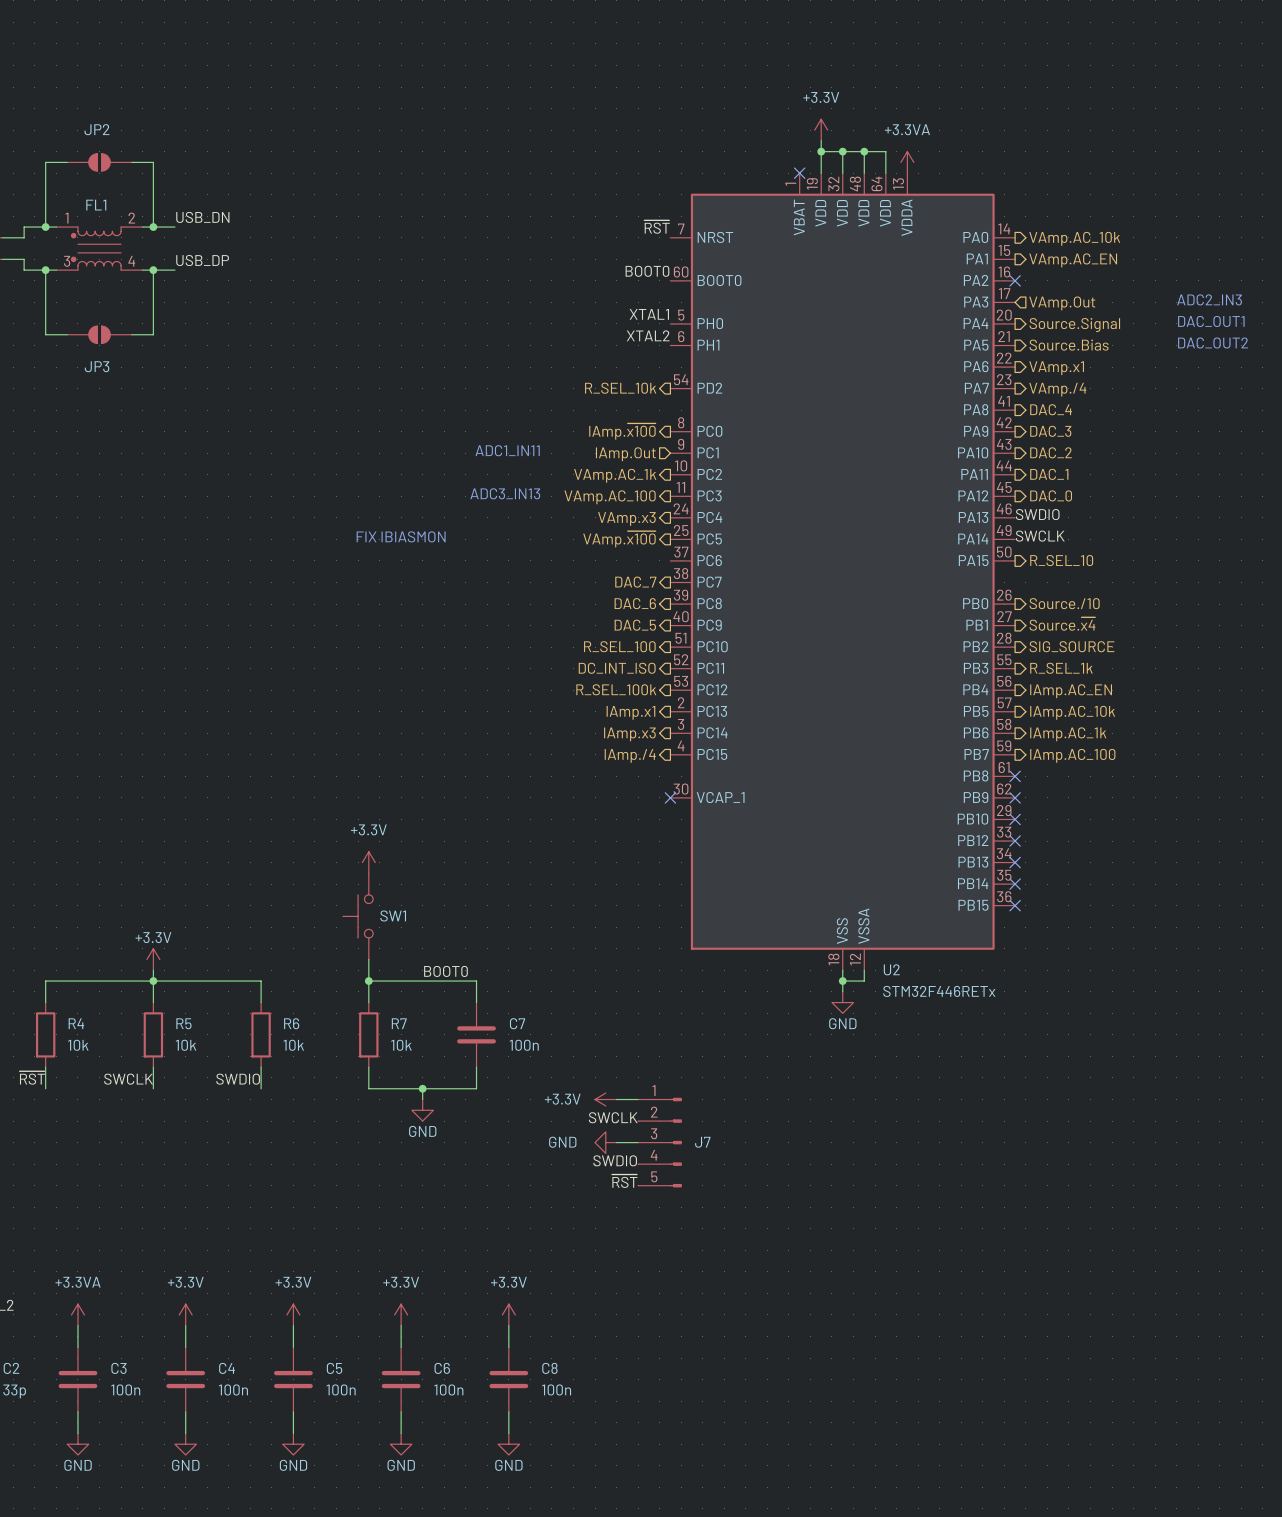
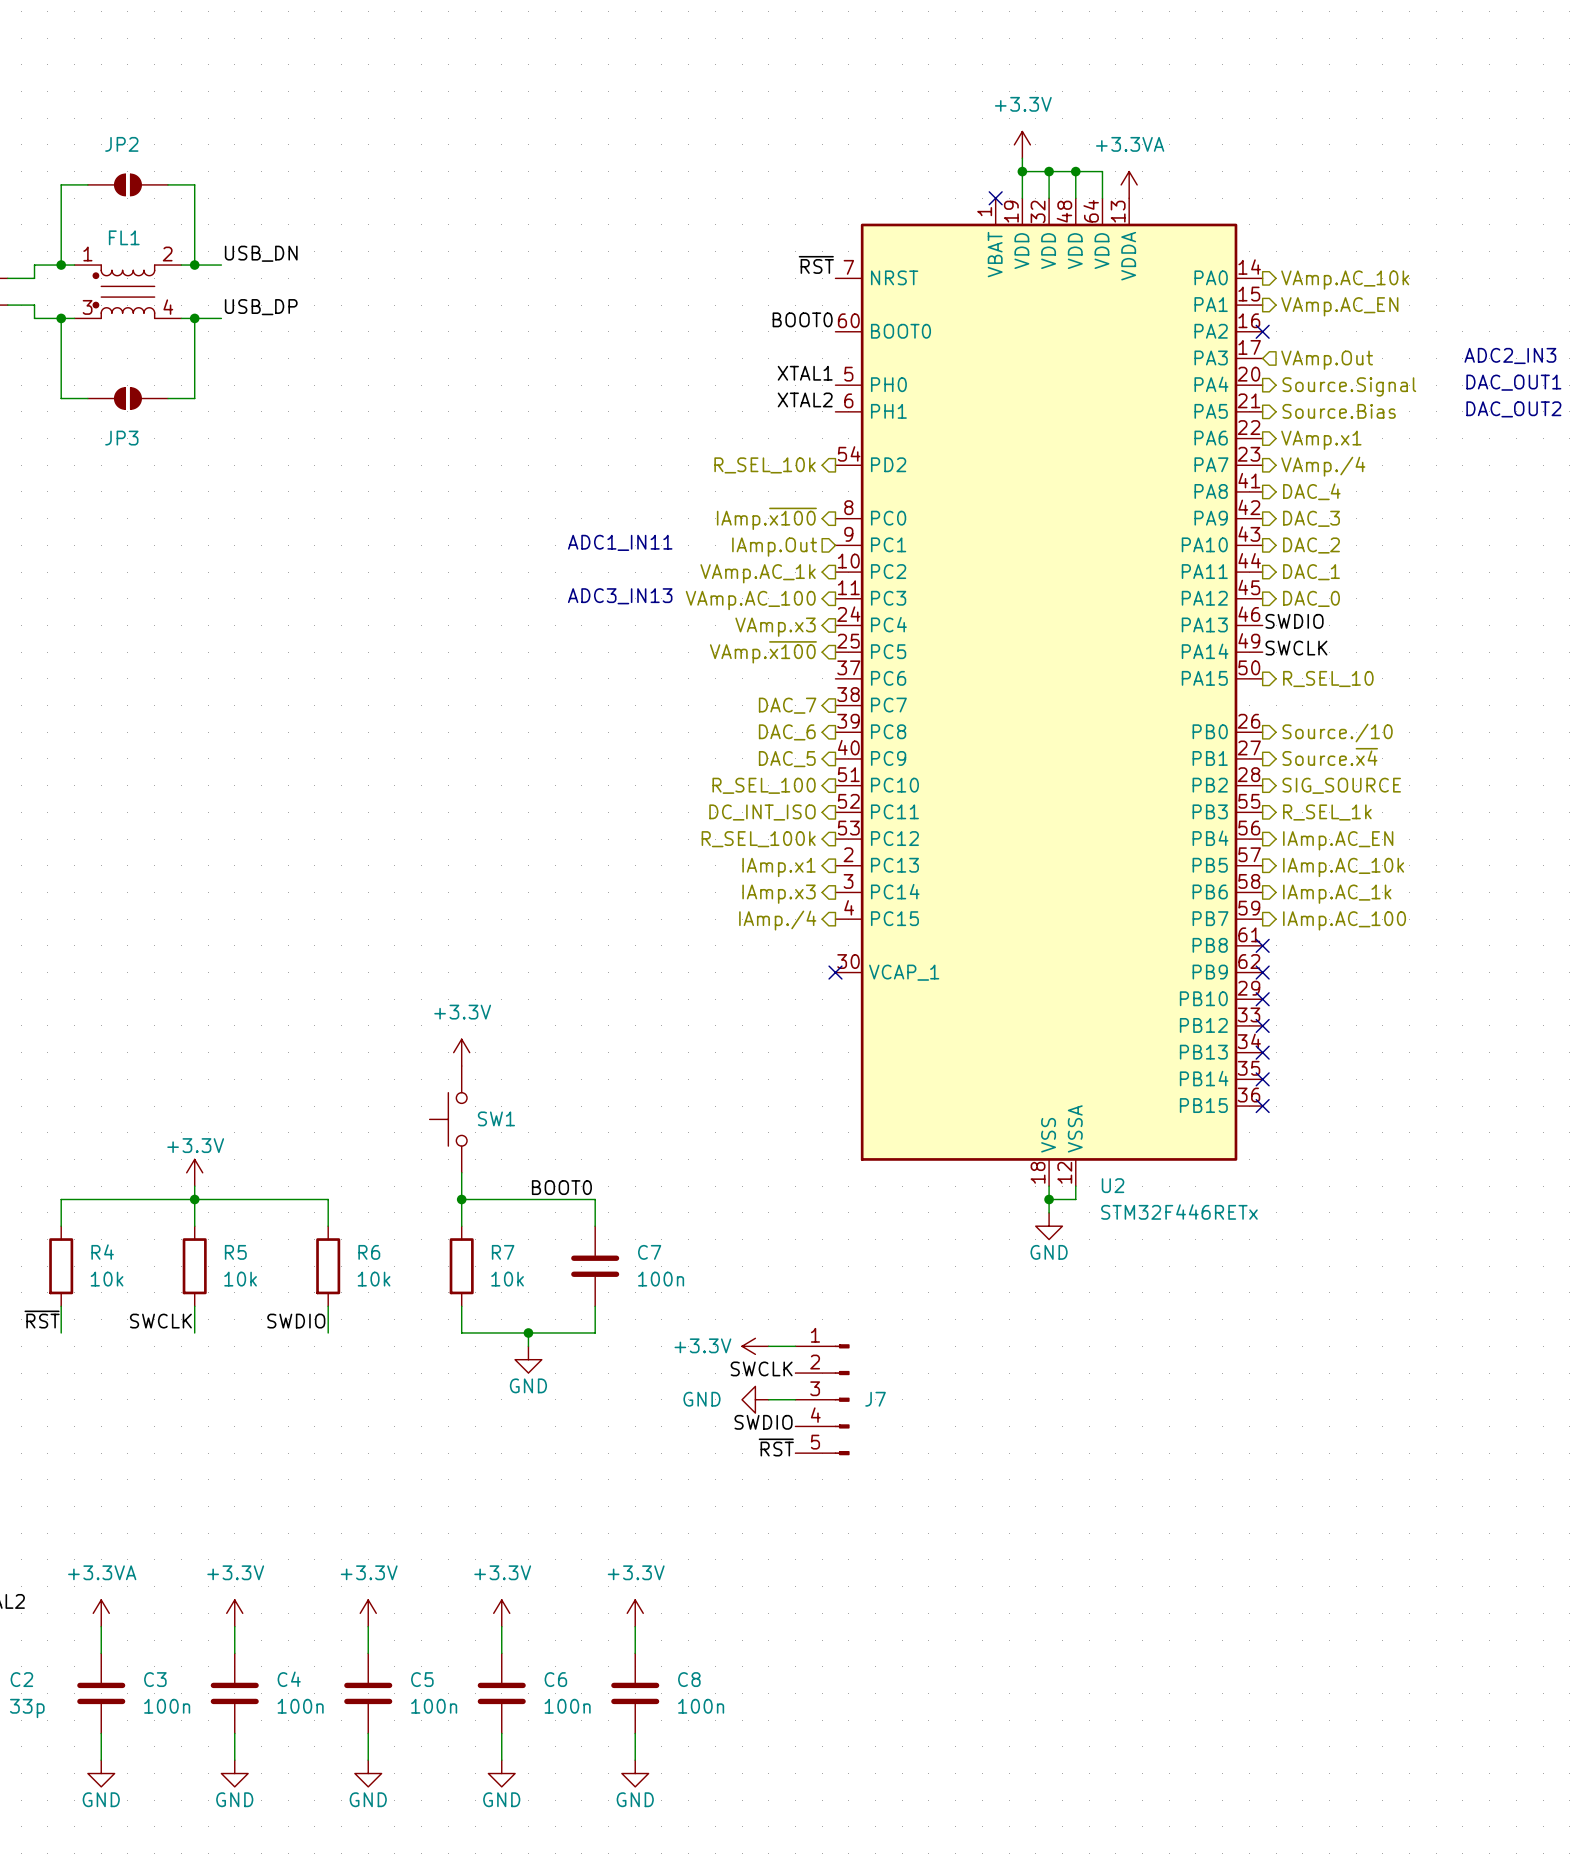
text: FIX IBIASMON (401, 536) -> none

